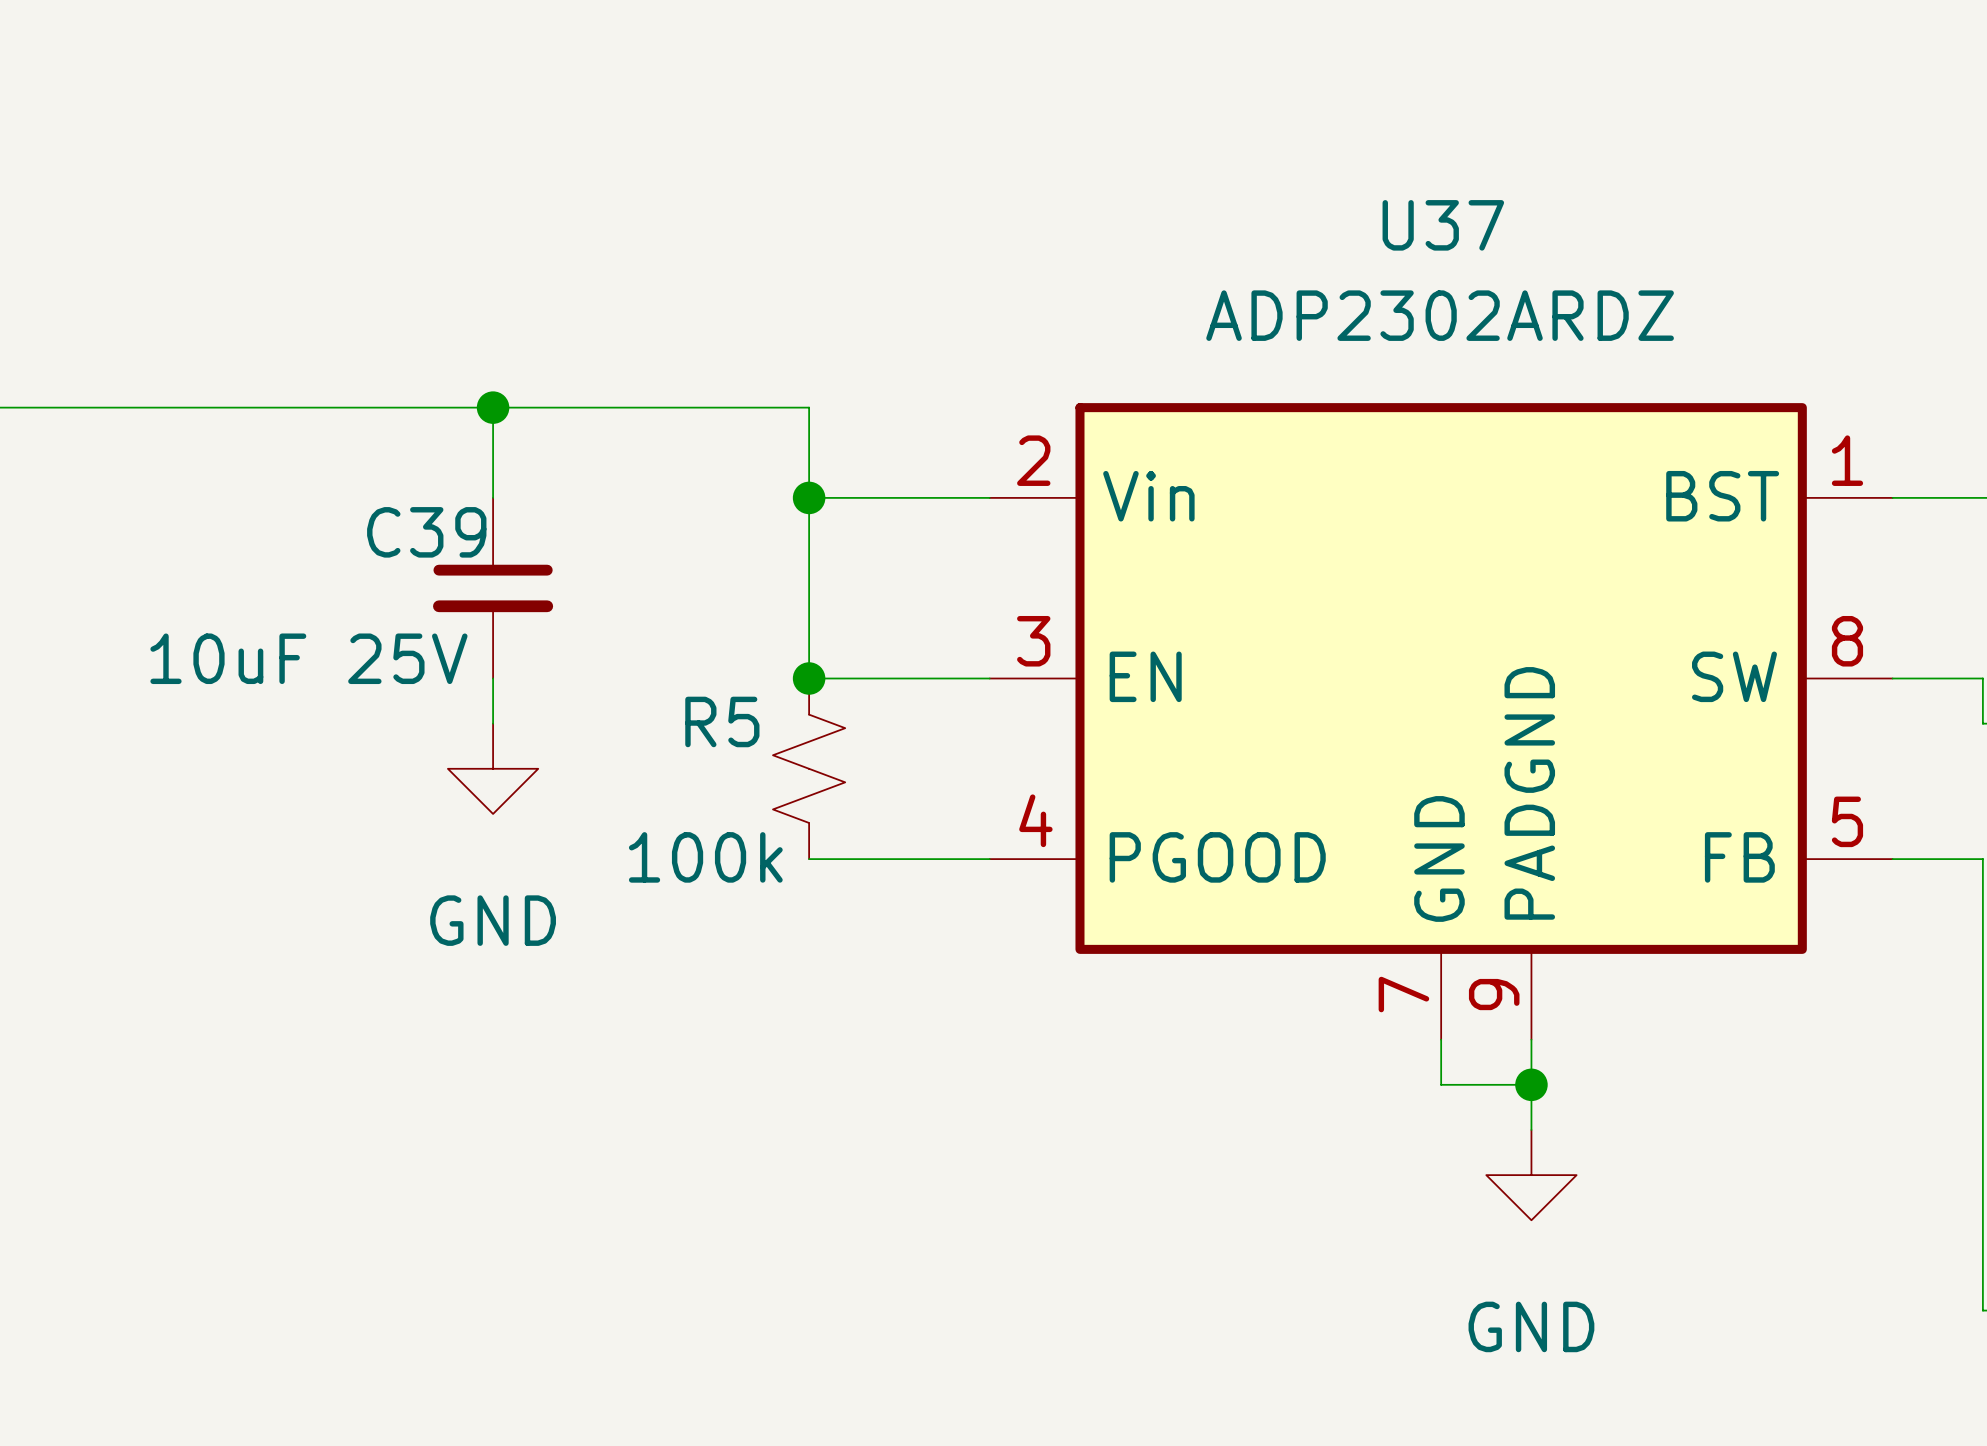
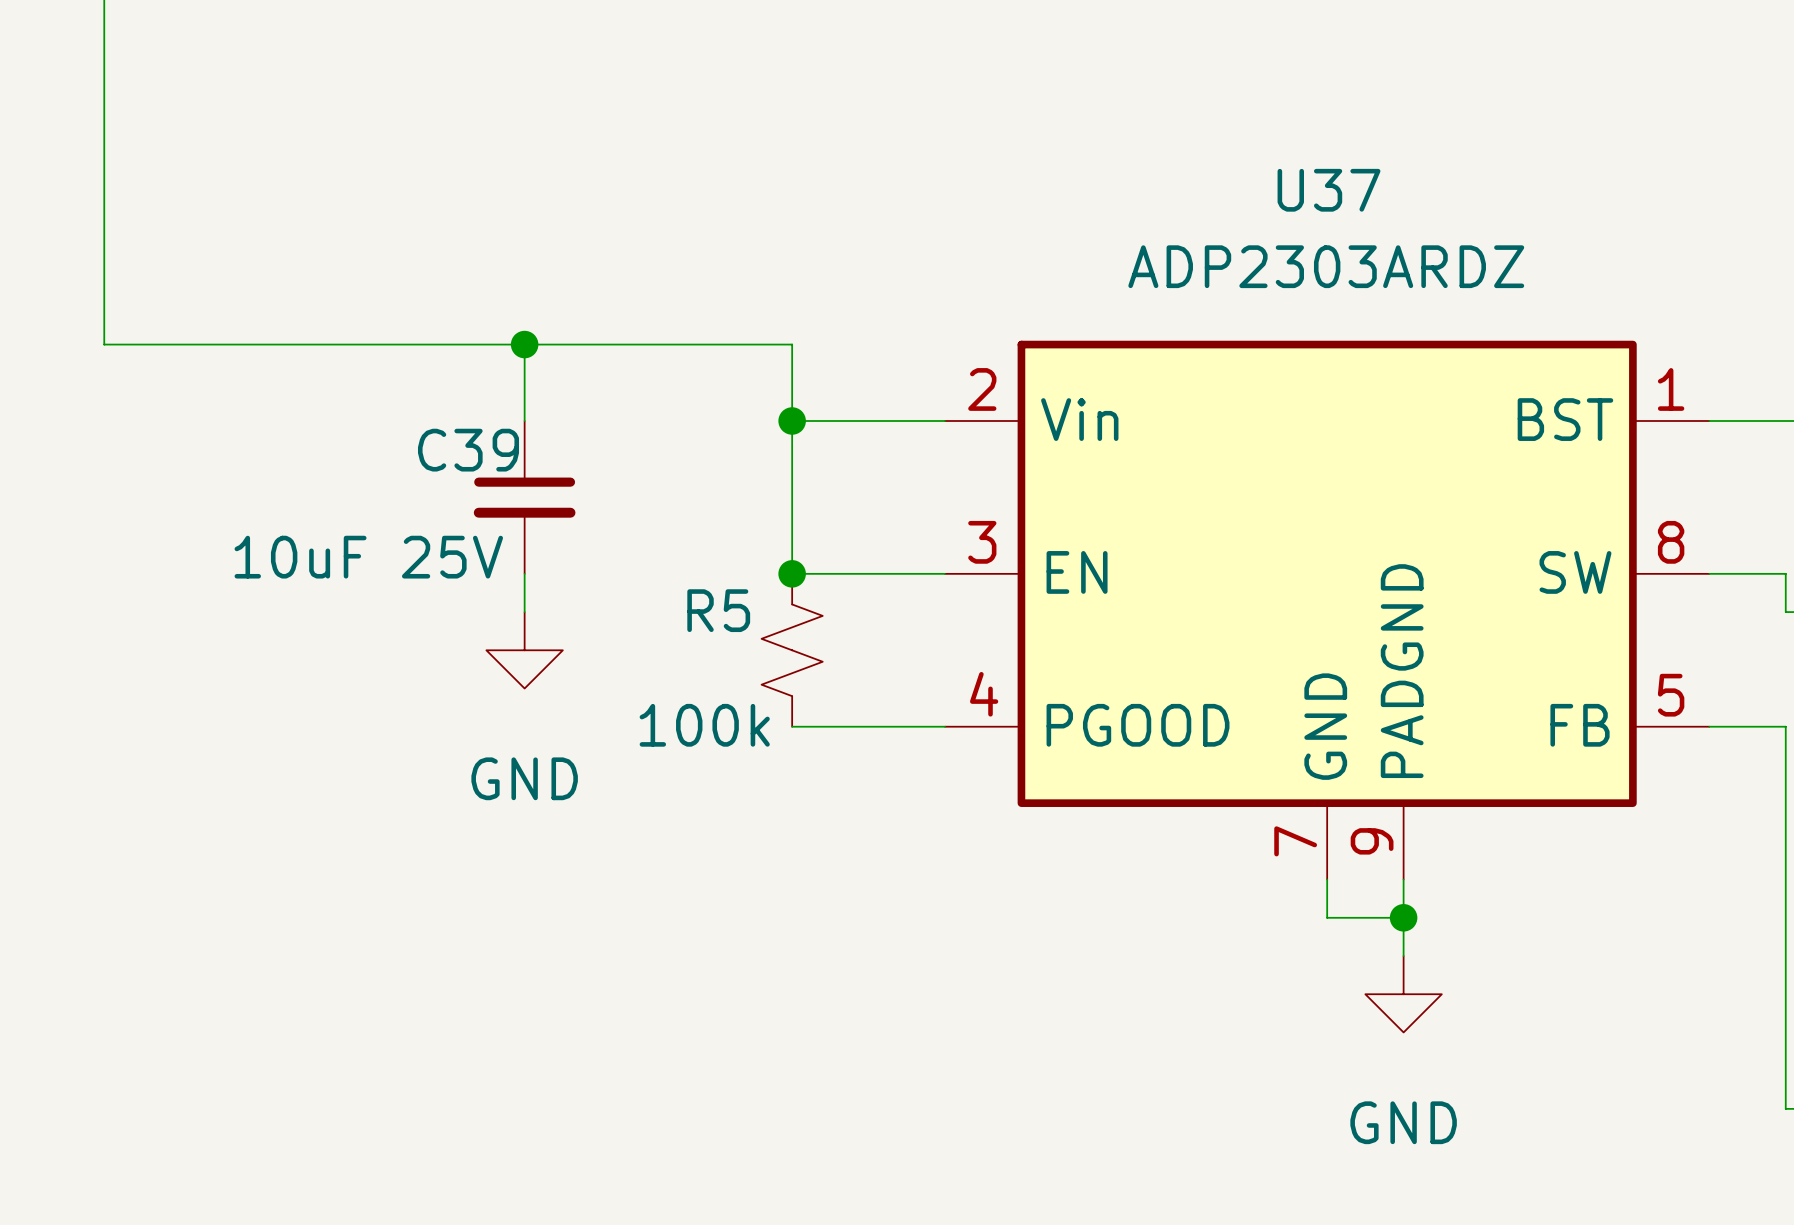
U37 value: ADP2302ARDZ (1440, 315) -> ADP2303ARDZ (1326, 266)

